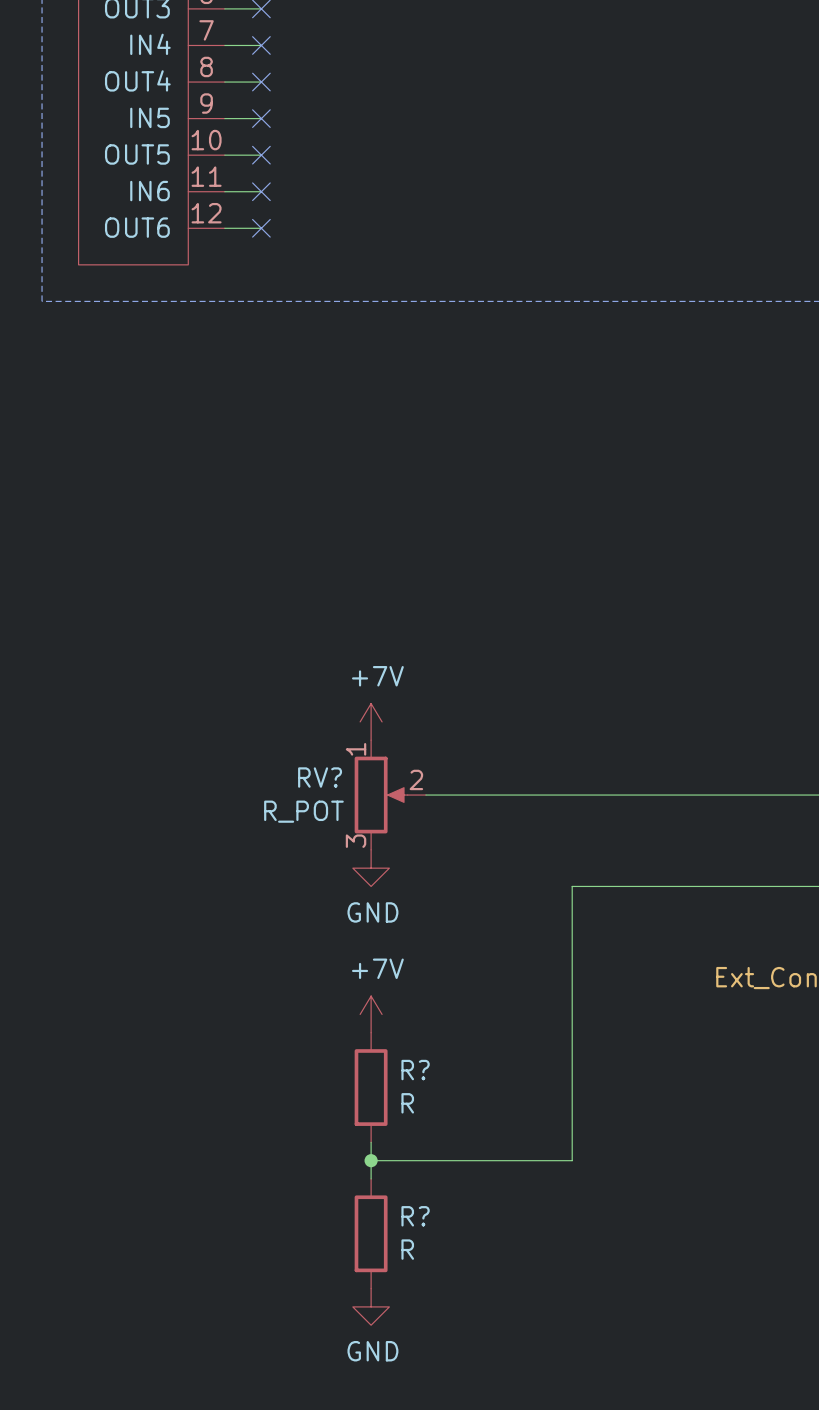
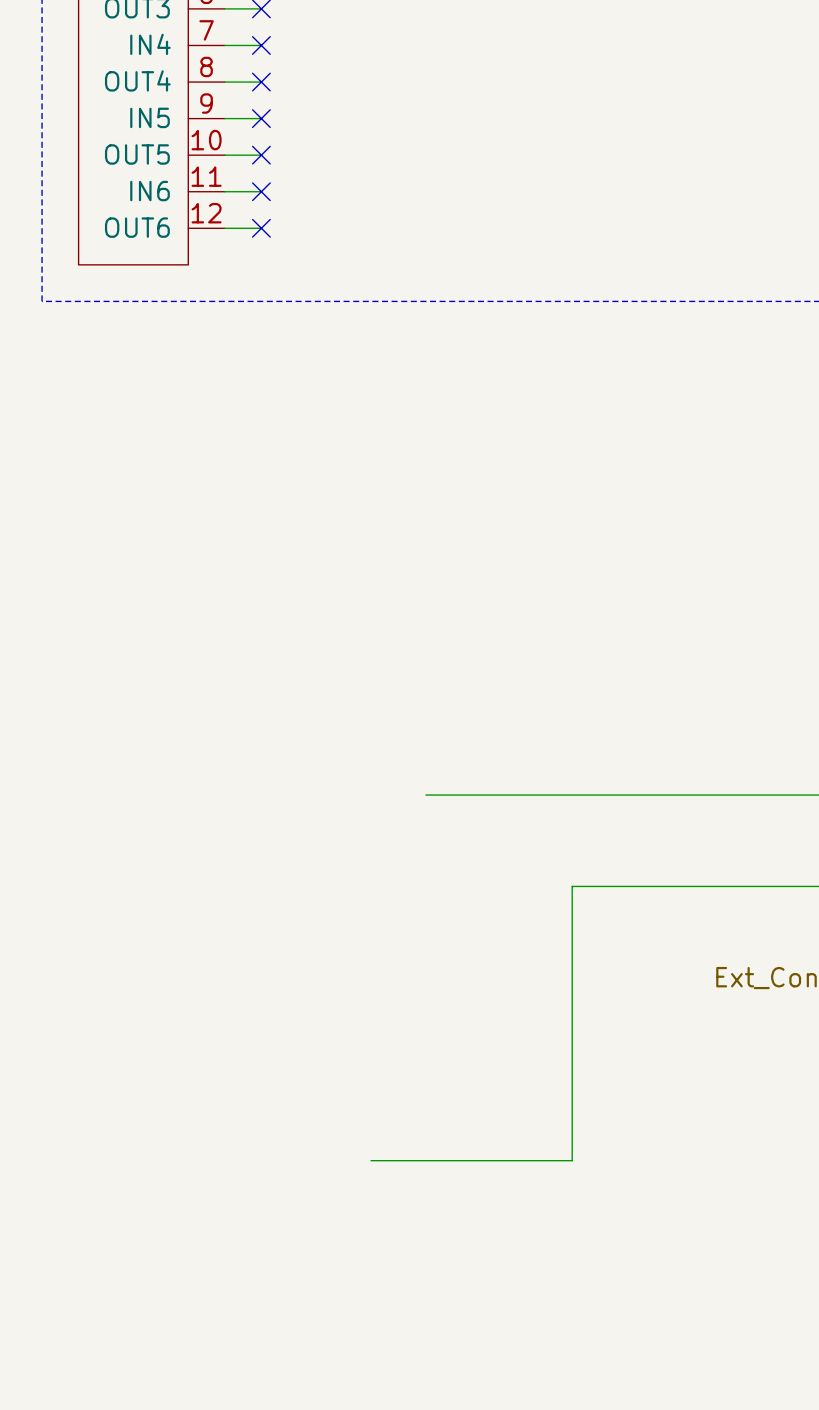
power symbol: +7V (371, 721) -> none
RV?: R_POT (390, 795) -> none
power symbol: GND (371, 868) -> none
power symbol: +7V (371, 1014) -> none
R?: R (371, 1087) -> none
wire: (371, 1142) (371, 1178) -> none
junction: (371, 1160) -> none
R?: R (371, 1233) -> none
power symbol: GND (371, 1306) -> none

